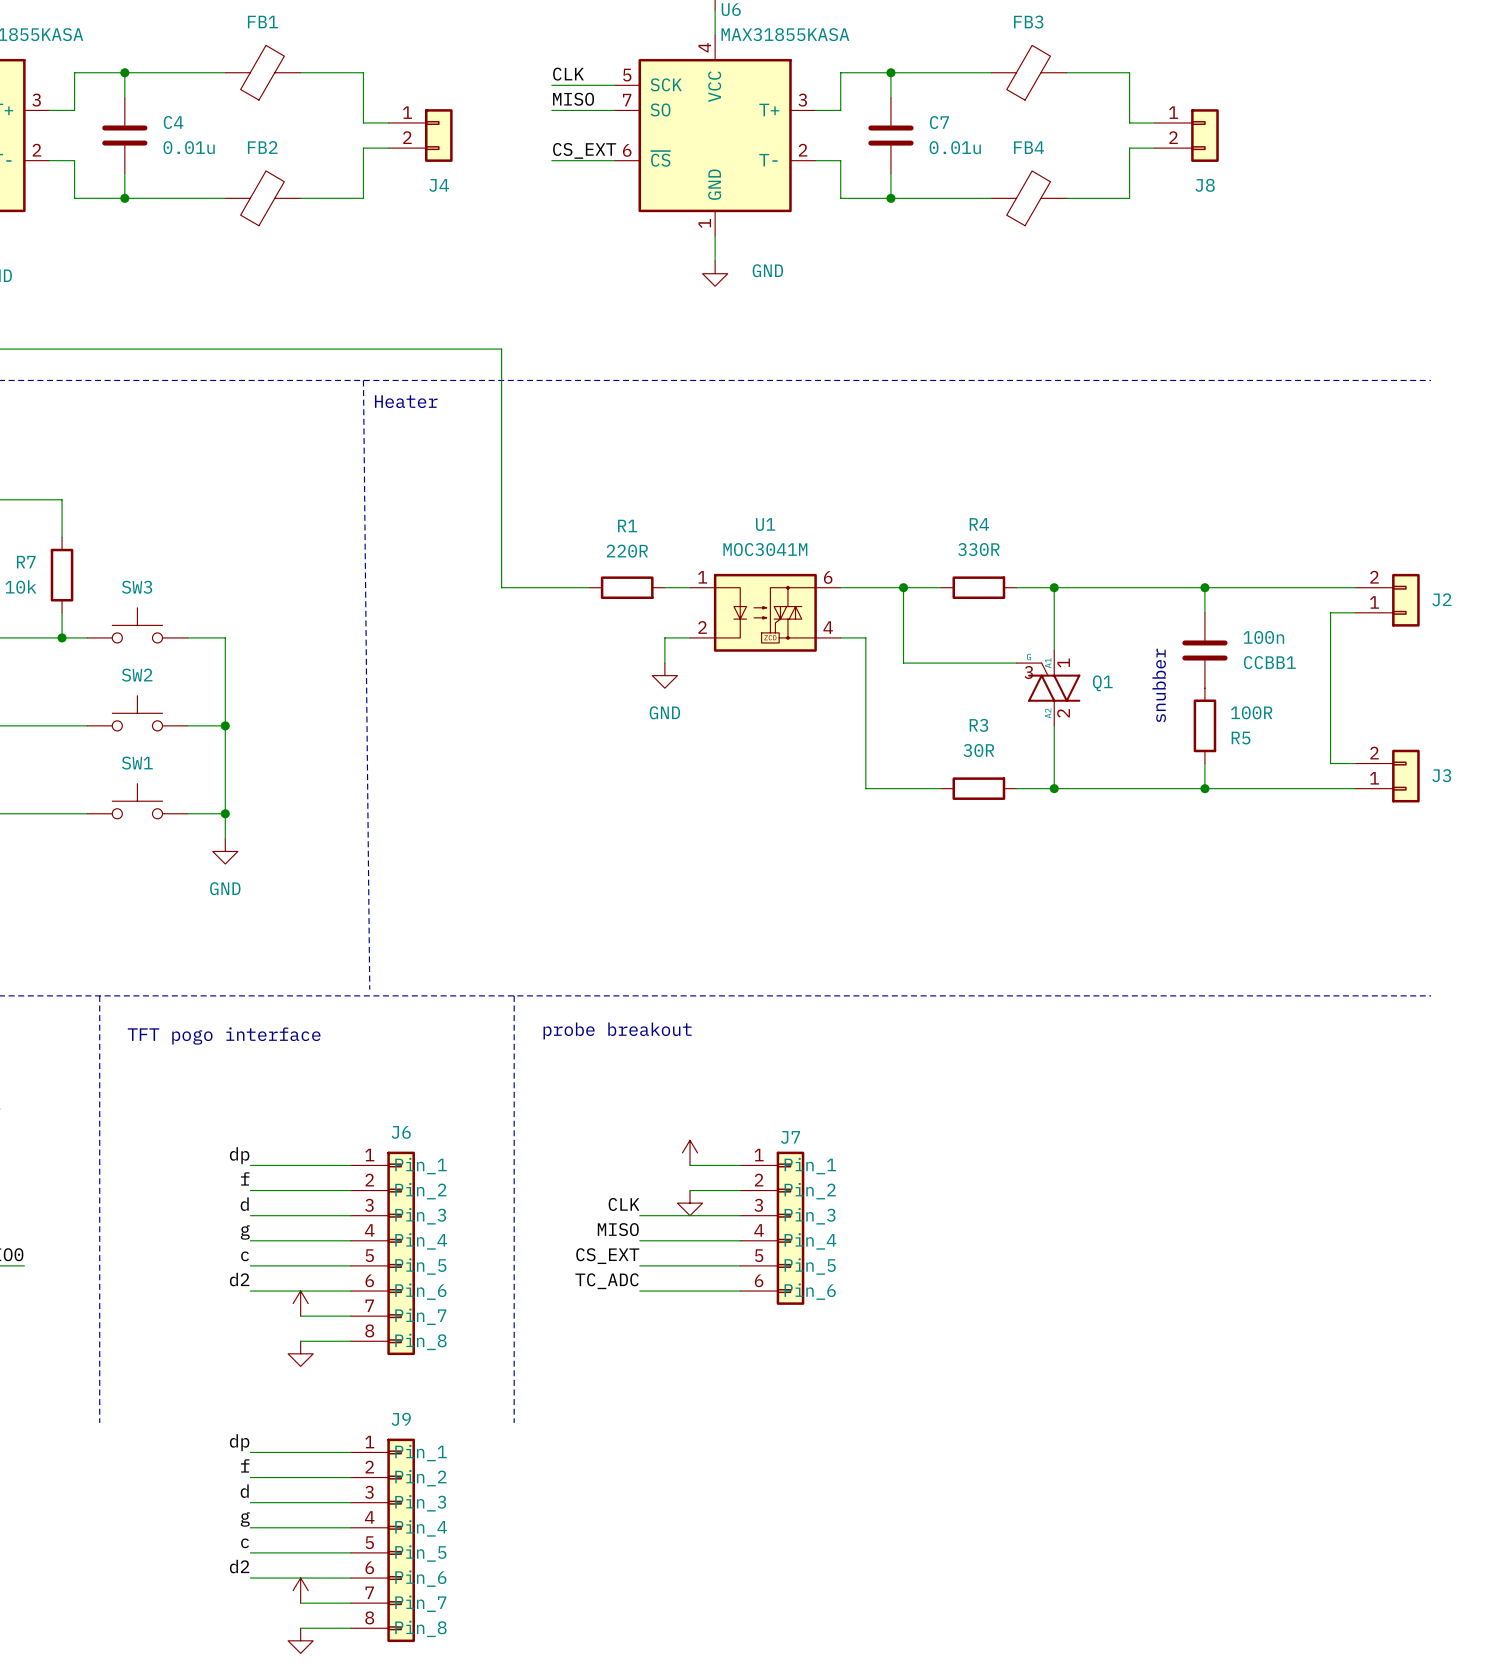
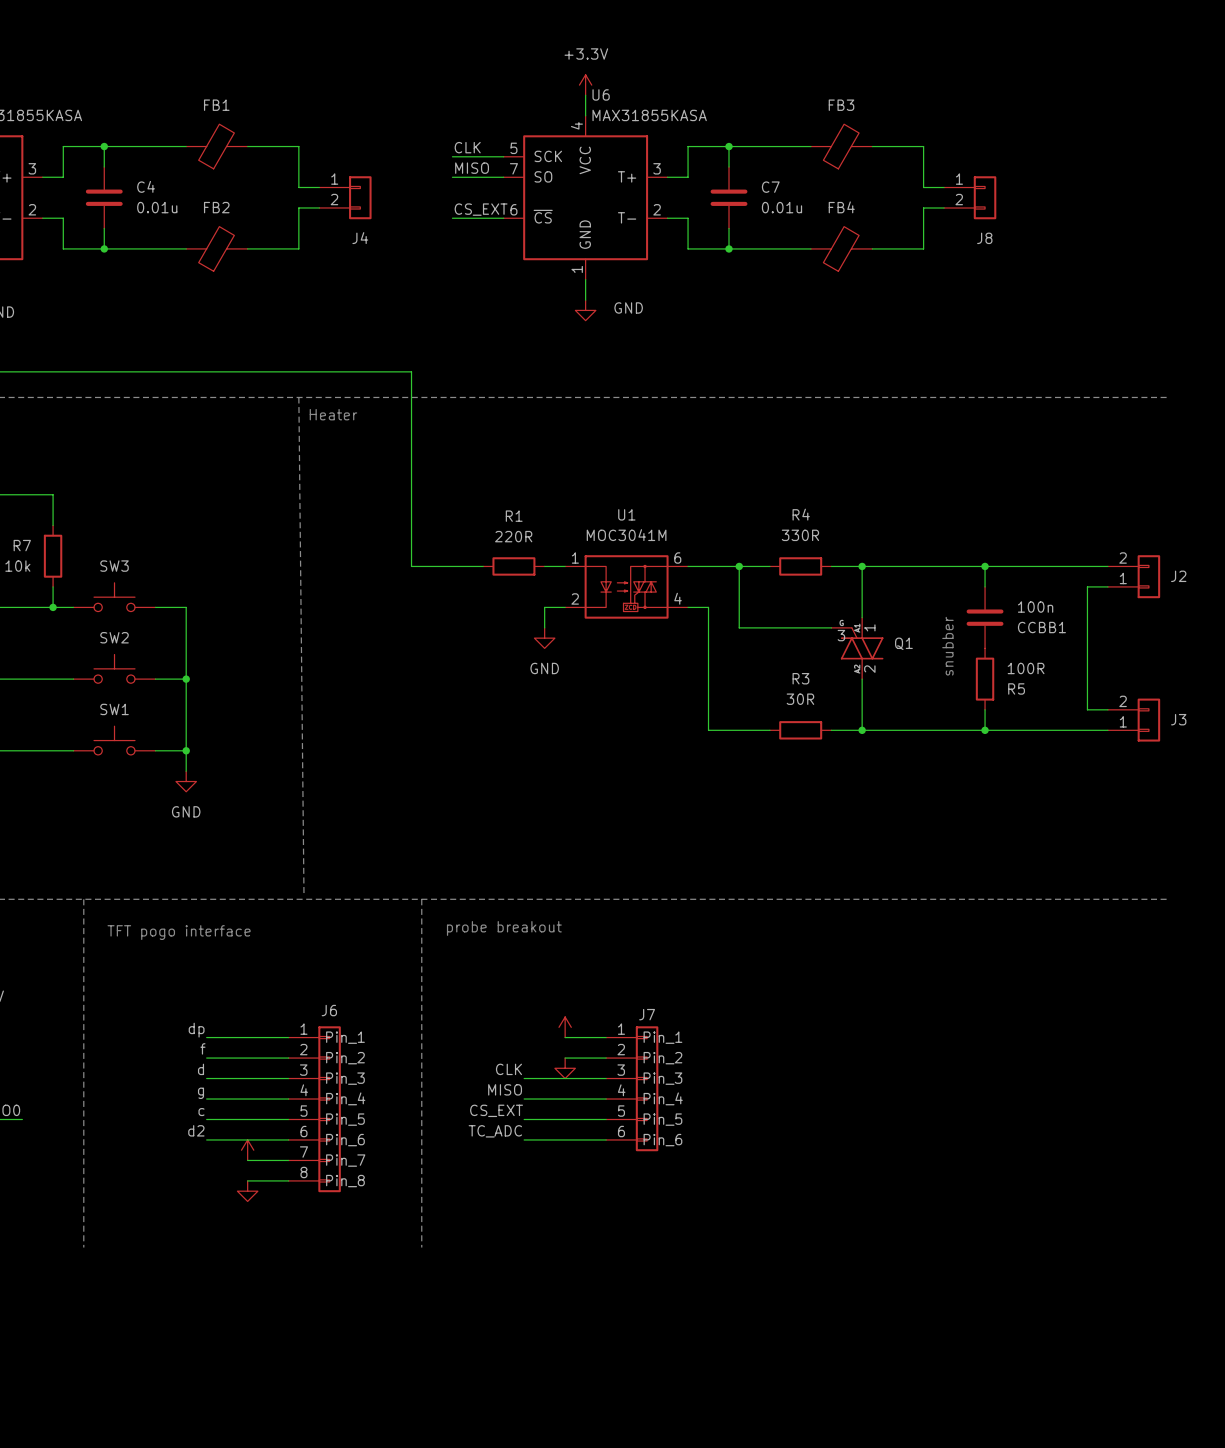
label: dp (239, 1442) -> none
wire: (250, 1452) (350, 1452) -> none
label: f (245, 1465) -> none
wire: (250, 1477) (350, 1477) -> none
label: d (244, 1491) -> none
wire: (250, 1502) (350, 1502) -> none
label: g (245, 1519) -> none
wire: (250, 1527) (350, 1527) -> none
J9: (382, 1540) -> none
label: c (245, 1543) -> none
wire: (250, 1552) (350, 1552) -> none
label: d2 (239, 1566) -> none
wire: (250, 1578) (350, 1578) -> none
power symbol: (300, 1590) -> none
wire: (300, 1603) (350, 1603) -> none
wire: (300, 1628) (350, 1628) -> none
power symbol: (300, 1640) -> none

